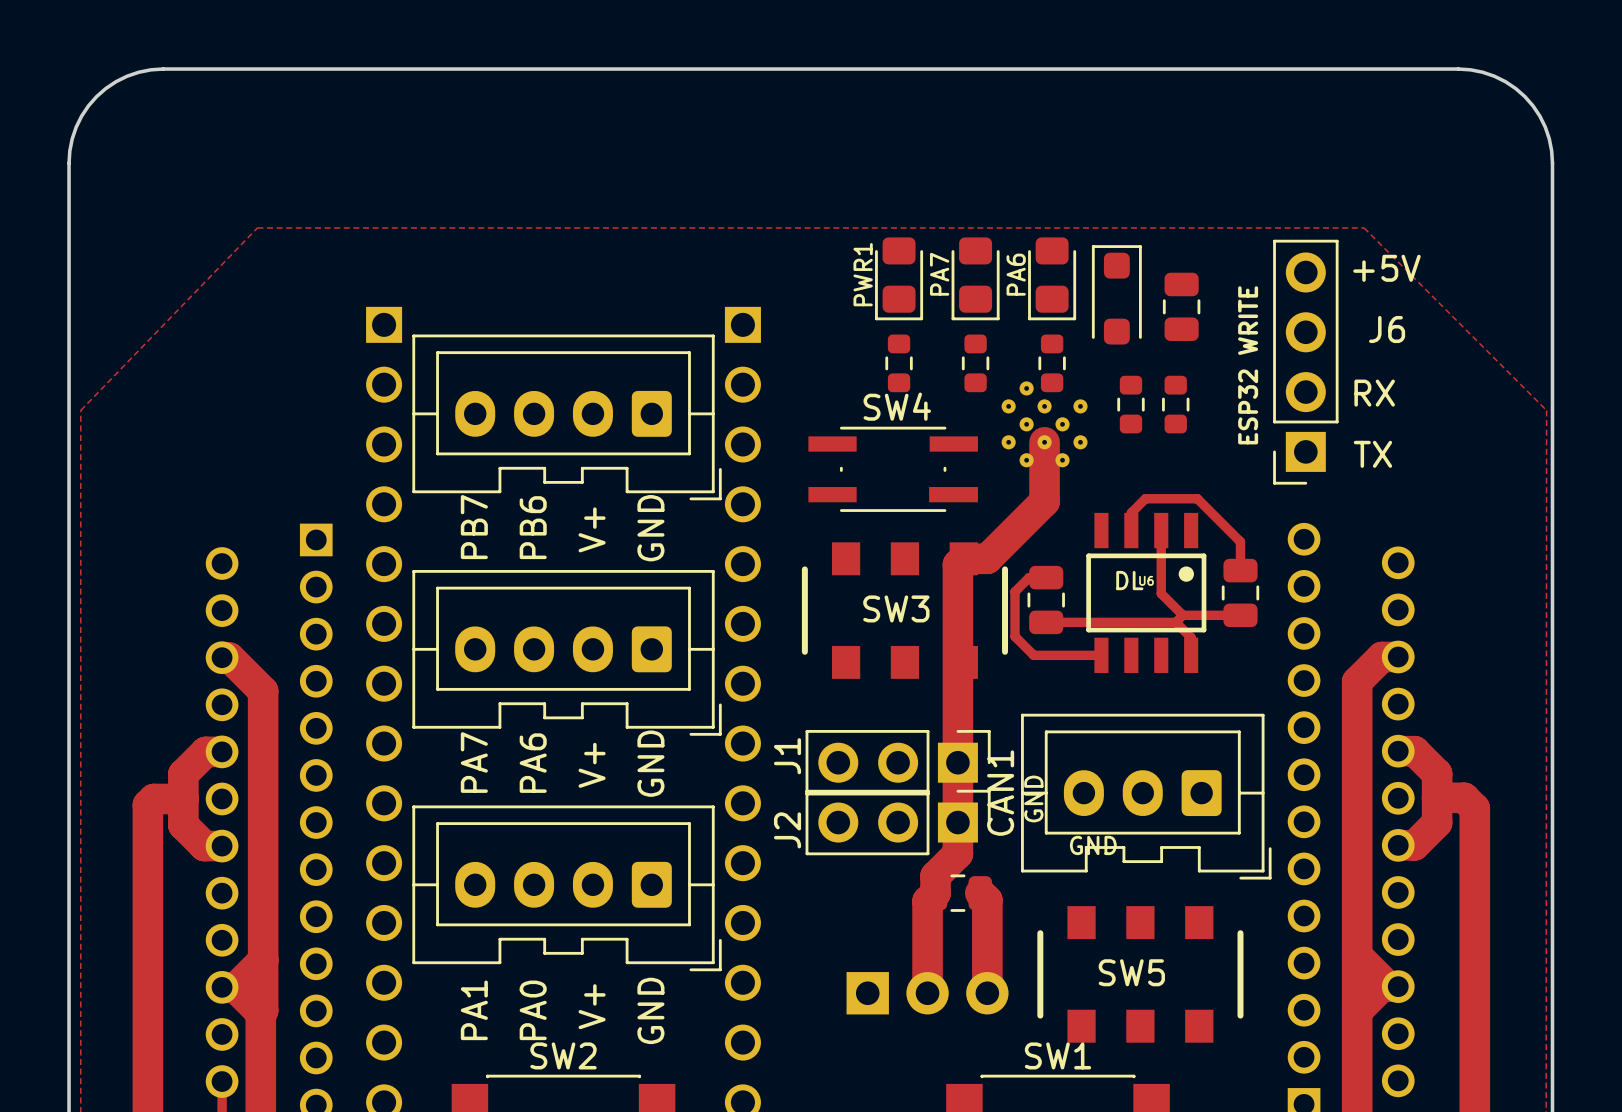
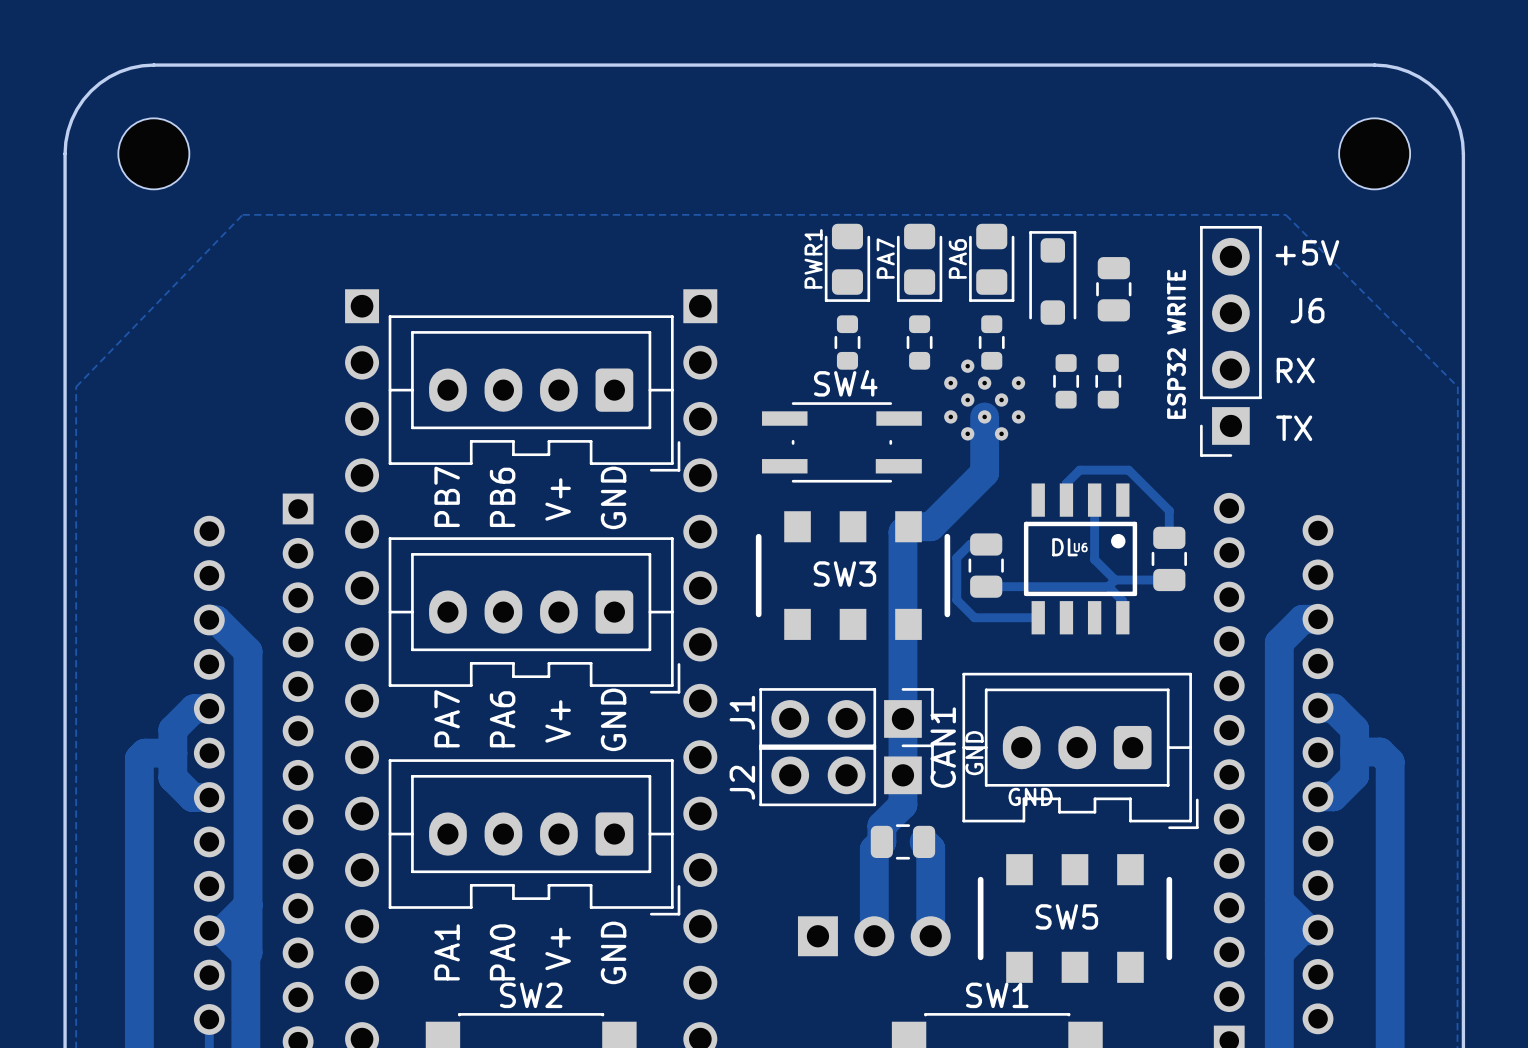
part: none -> (153, 153)
part: none -> (1374, 153)

